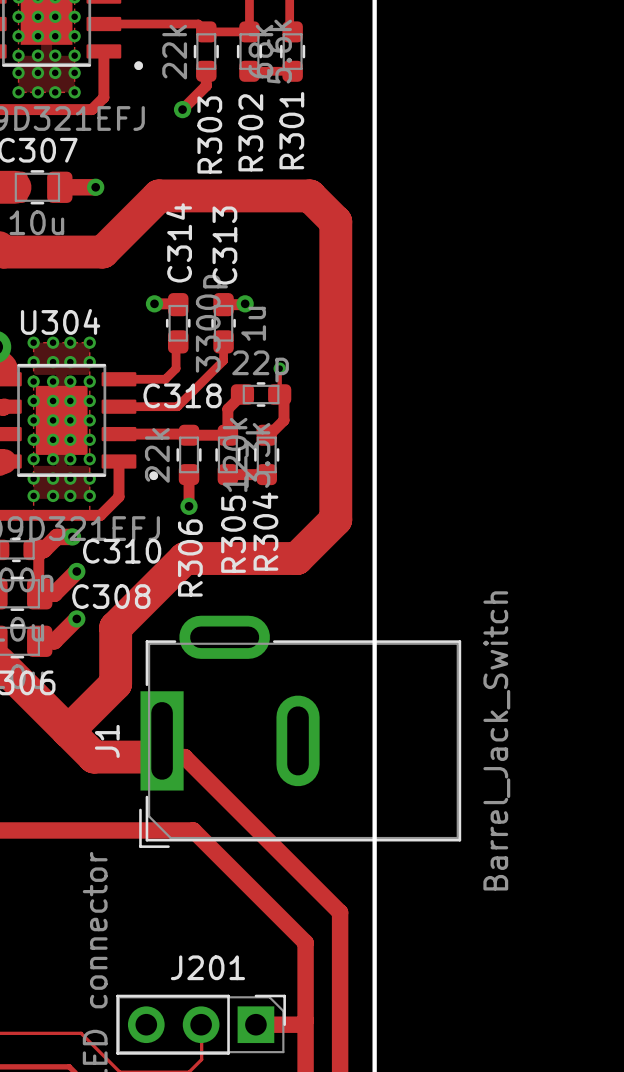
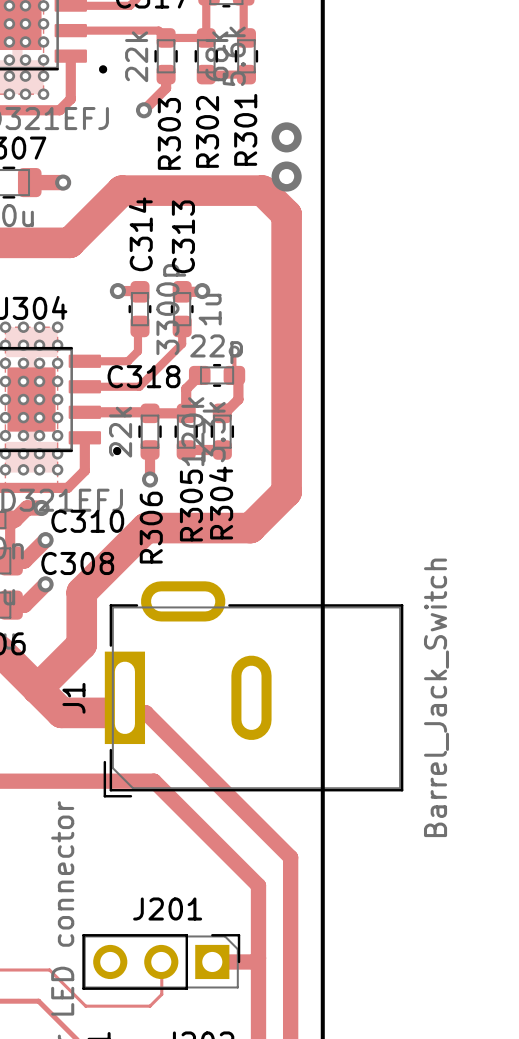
via: none -> (286, 137)
via: none -> (286, 176)

